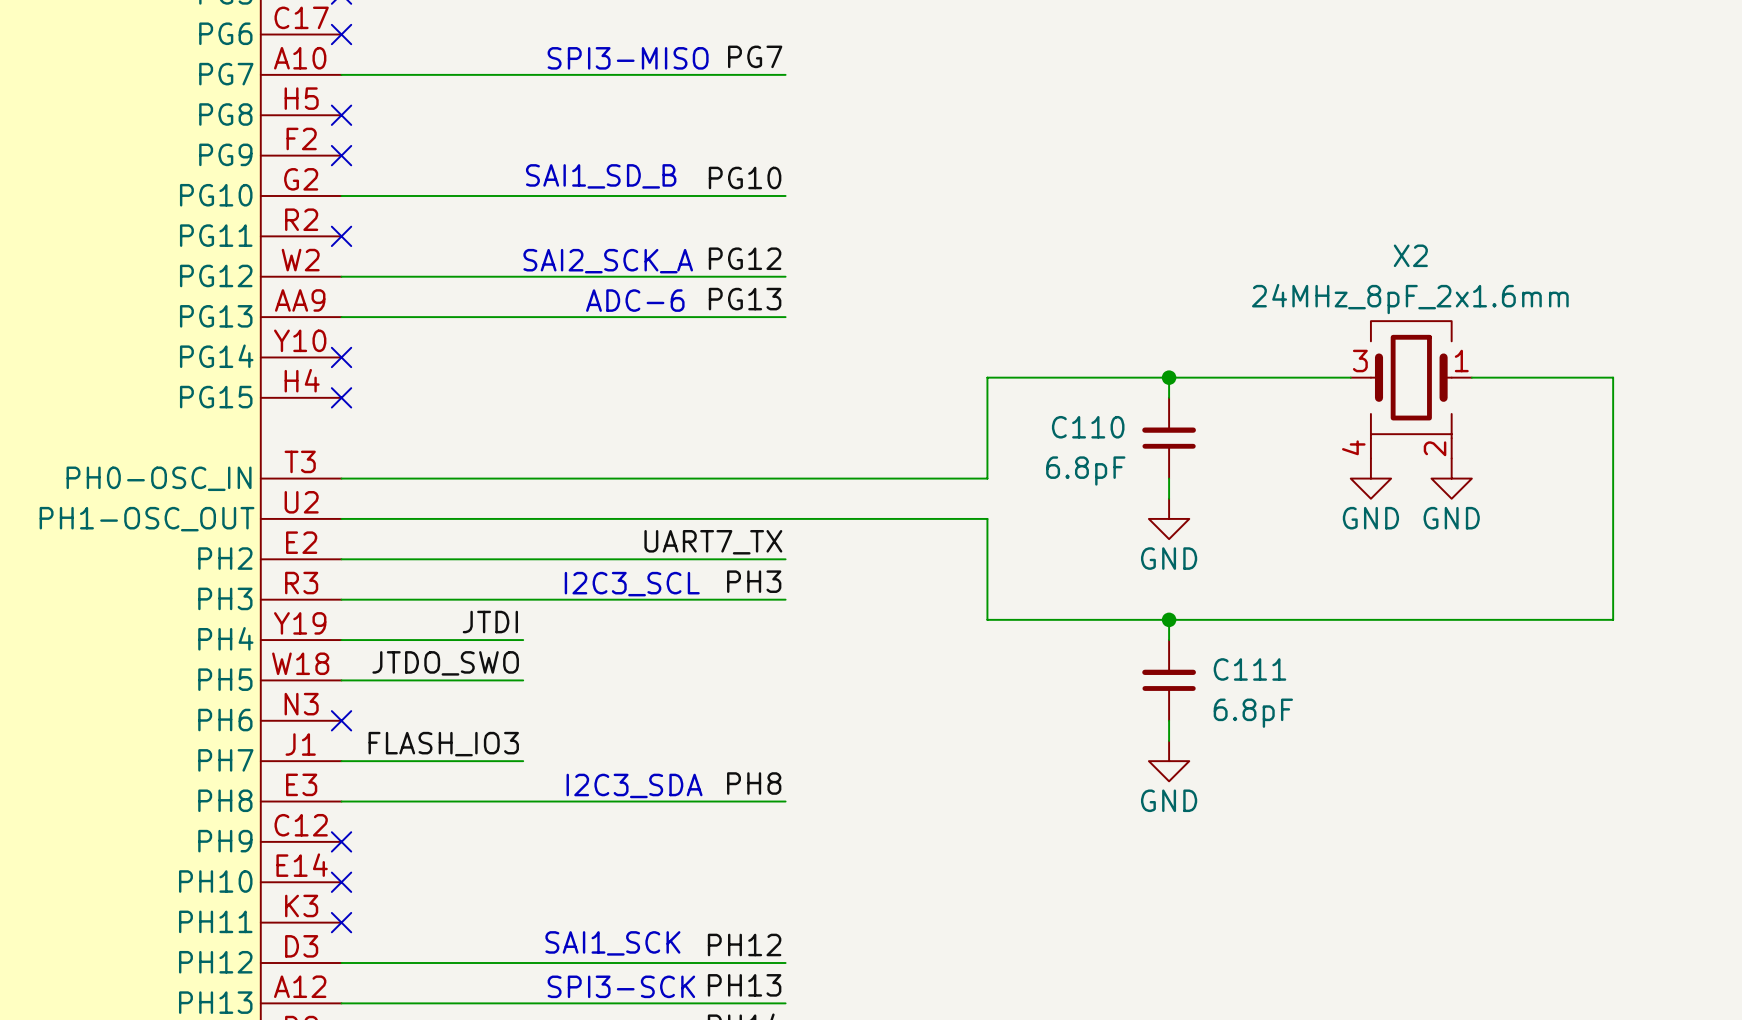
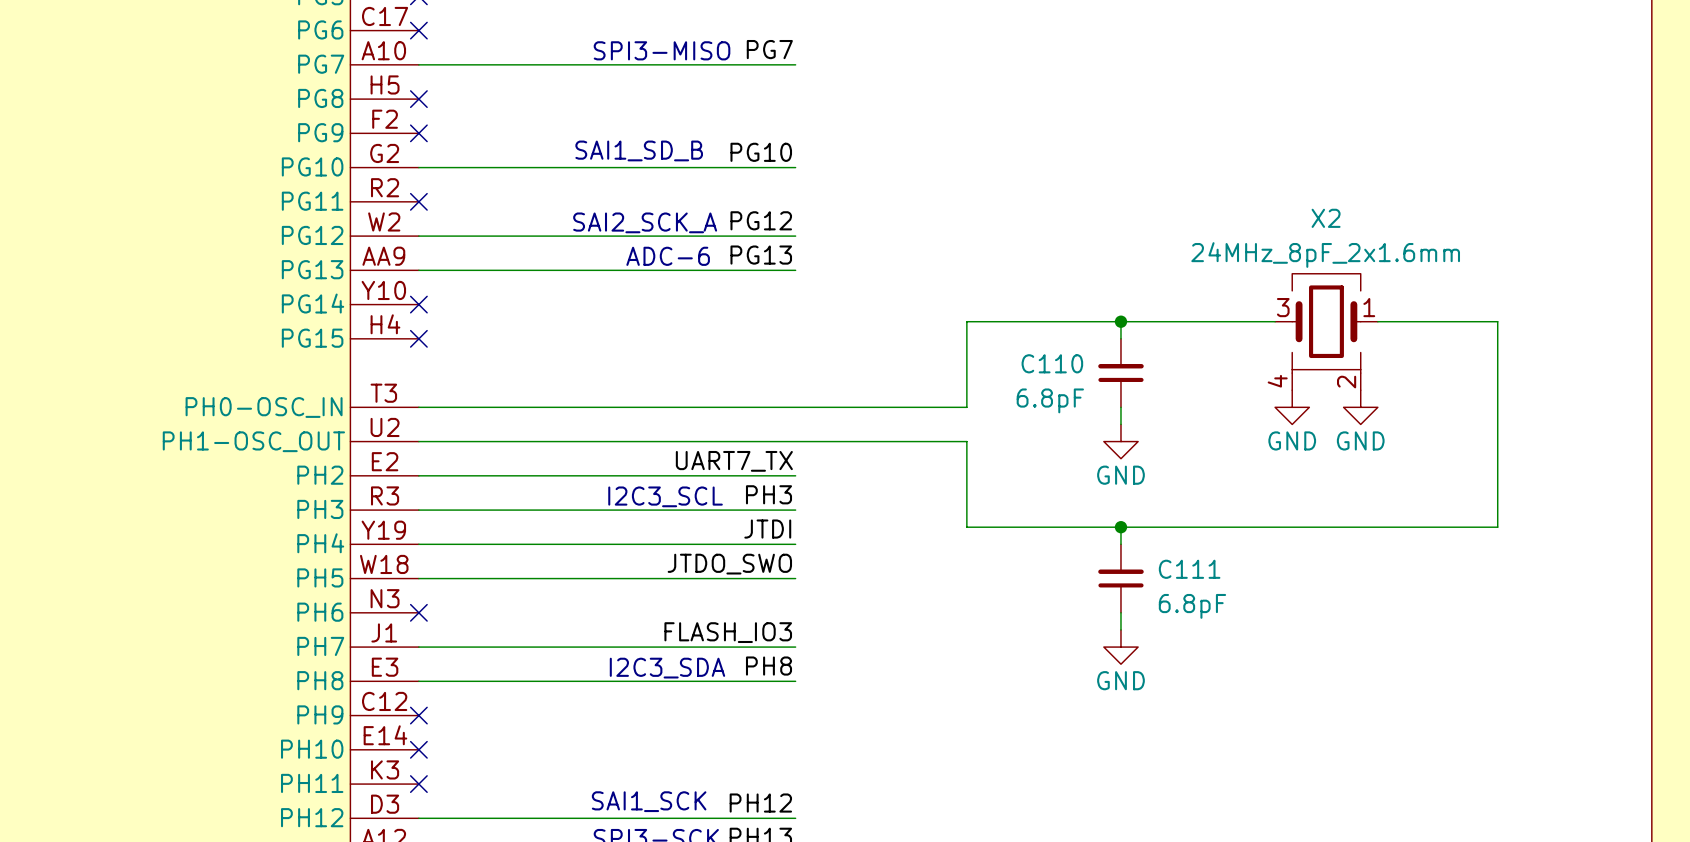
label position: JTDI (490, 622) -> JTDI (767, 529)
wire: none -> (573, 544) (795, 544)
label position: JTDO_SWO (445, 663) -> JTDO_SWO (729, 564)
wire: none -> (573, 578) (795, 578)
label position: FLASH_IO3 (443, 744) -> FLASH_IO3 (728, 632)
wire: none -> (573, 647) (795, 647)

